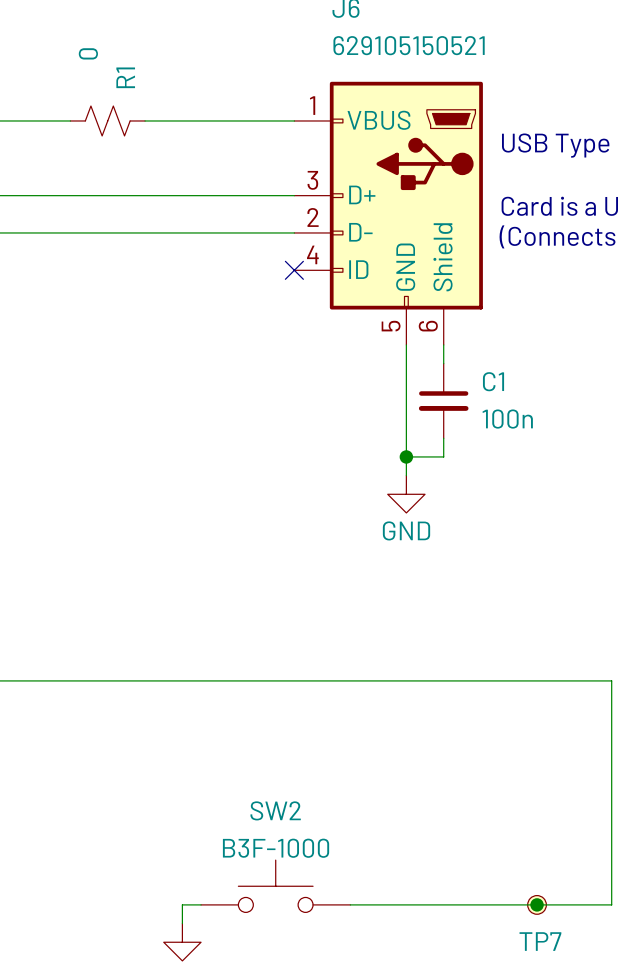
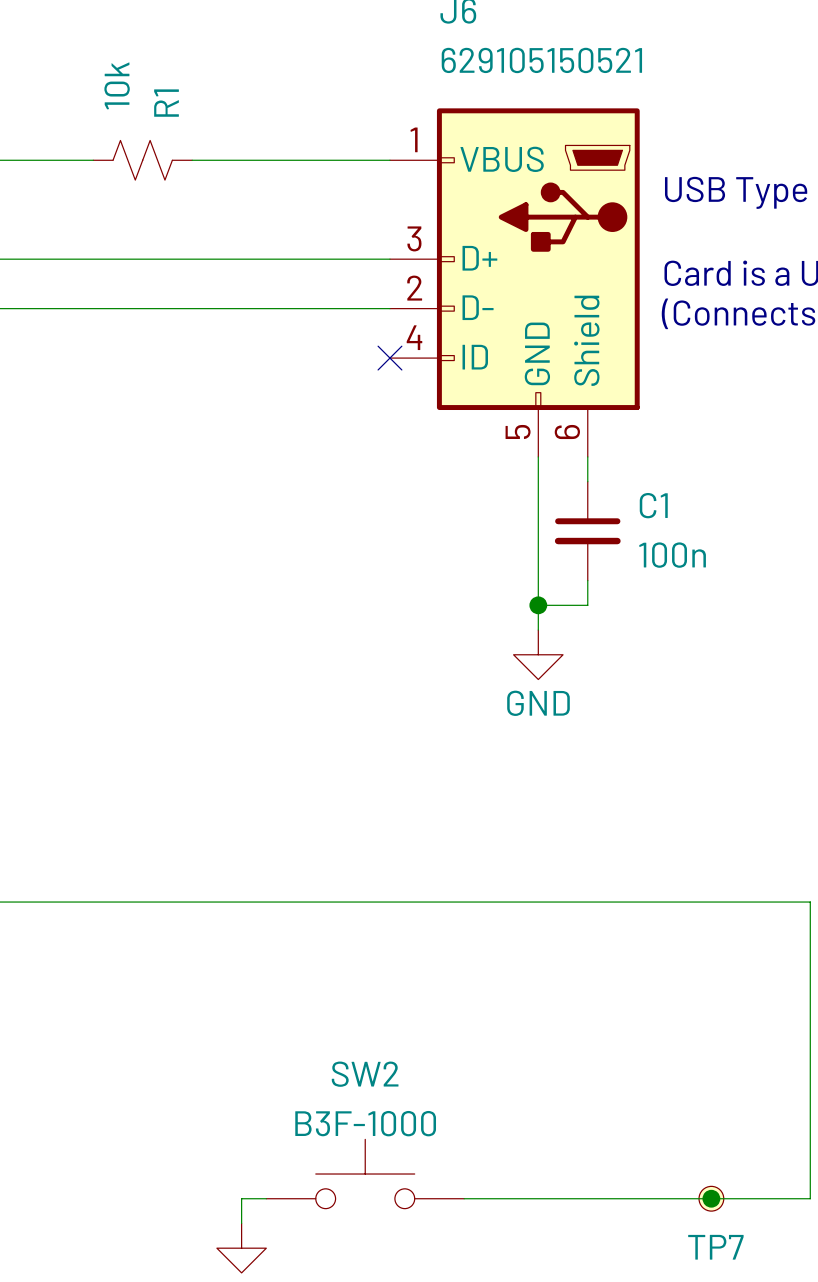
R1 value: 0 (88, 53) -> 10k (117, 85)

